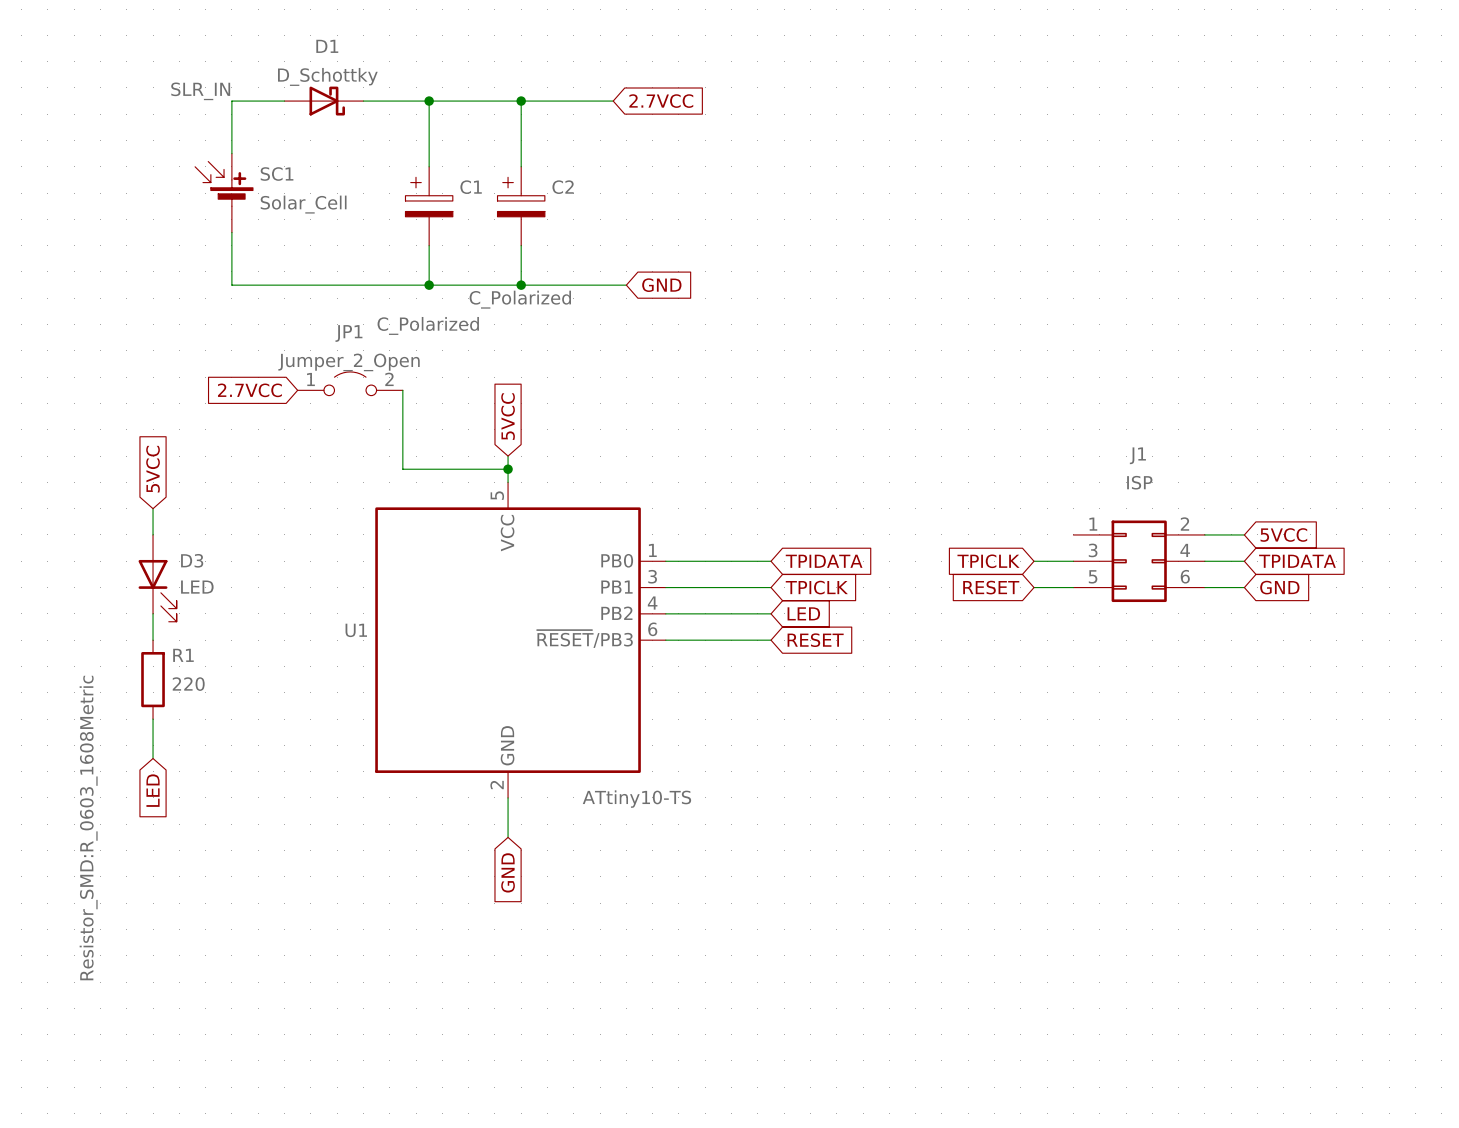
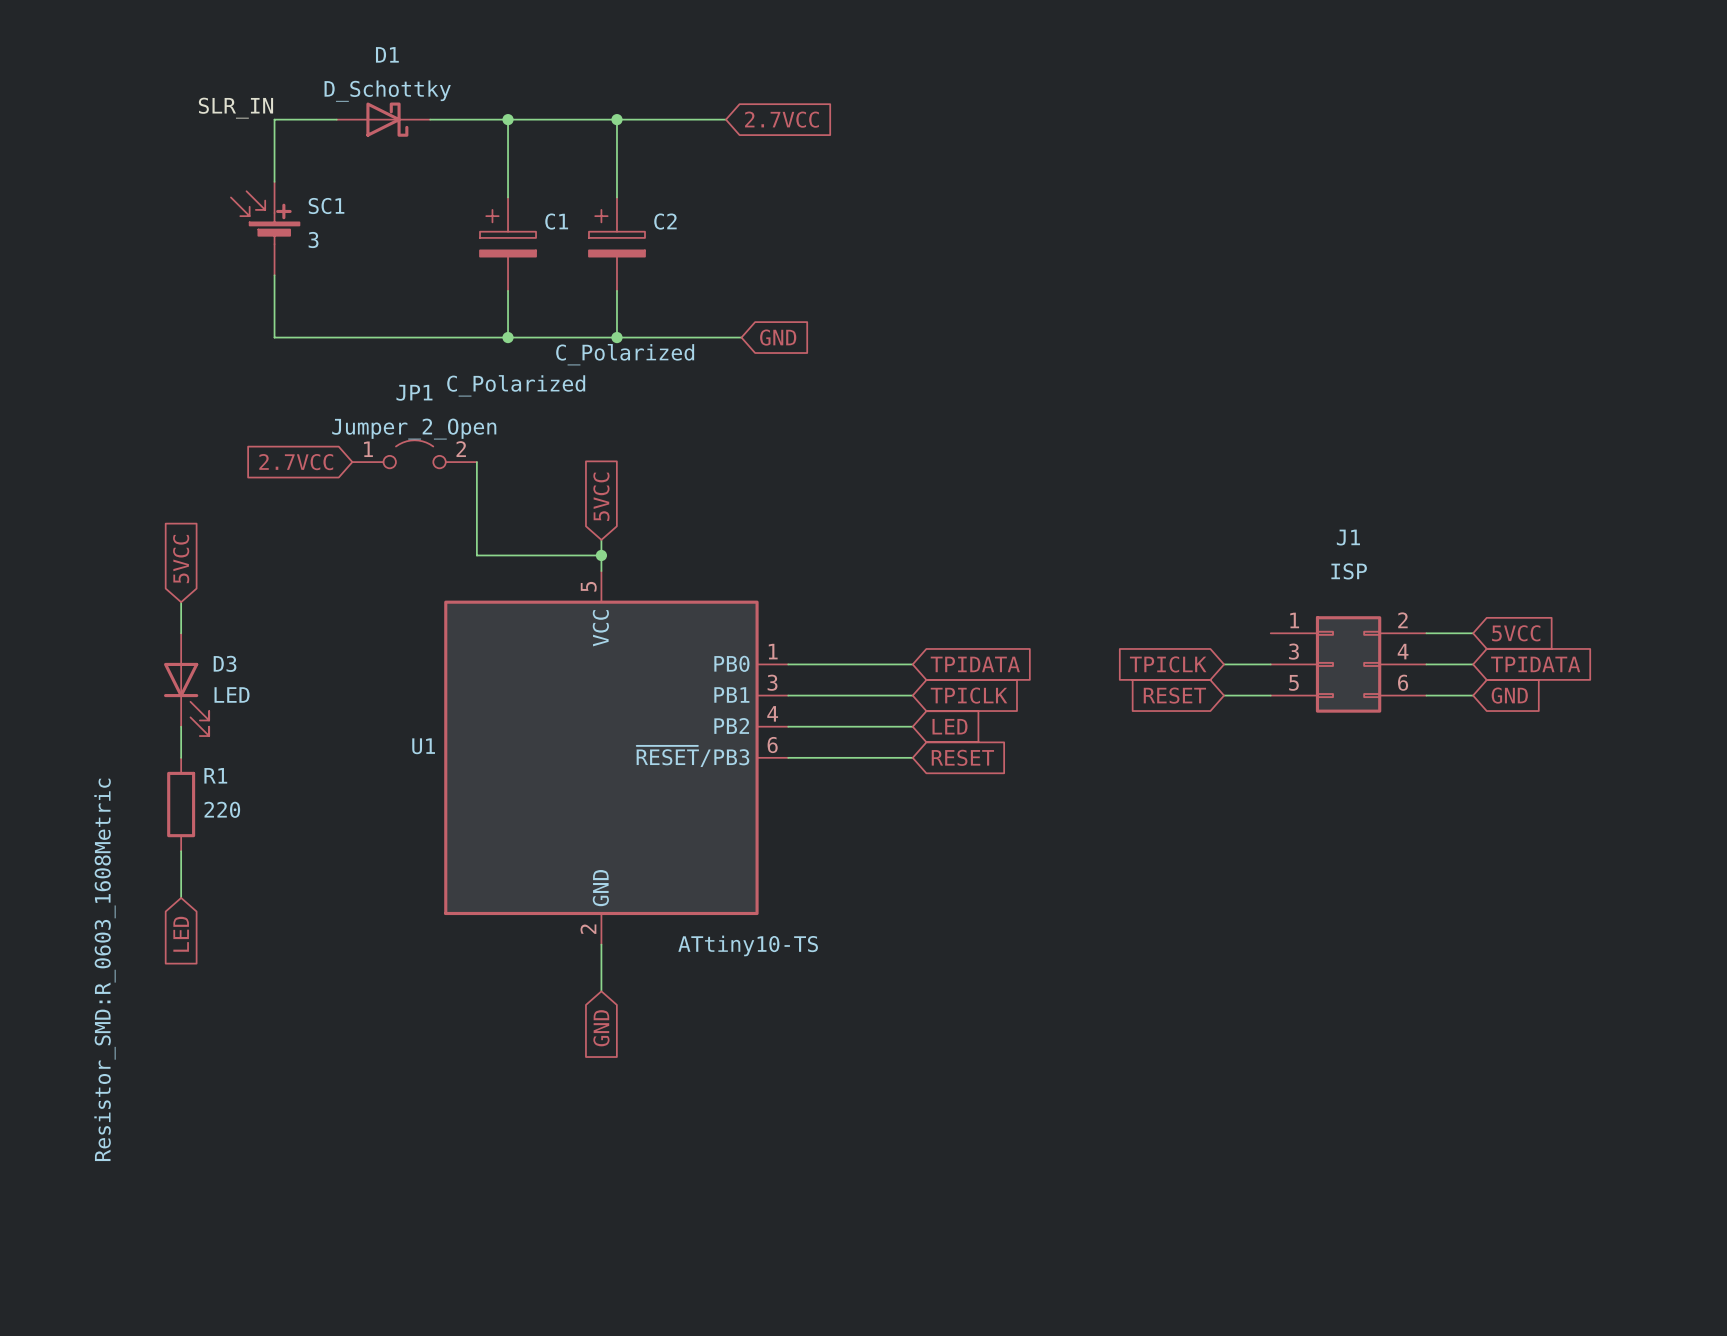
SC1 value: Solar_Cell (303, 204) -> 3 (313, 240)

